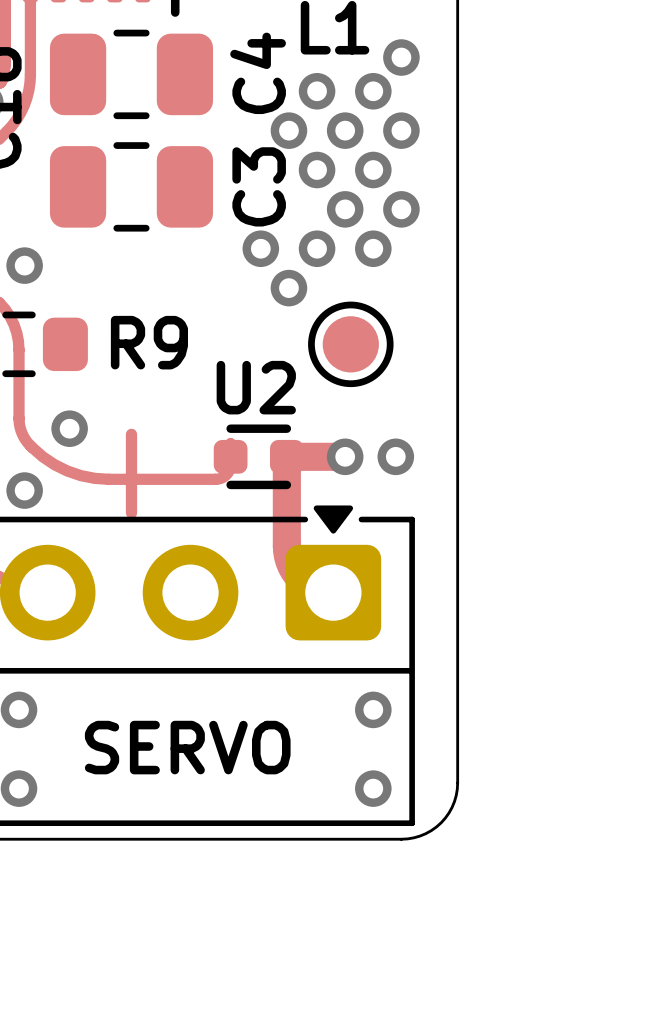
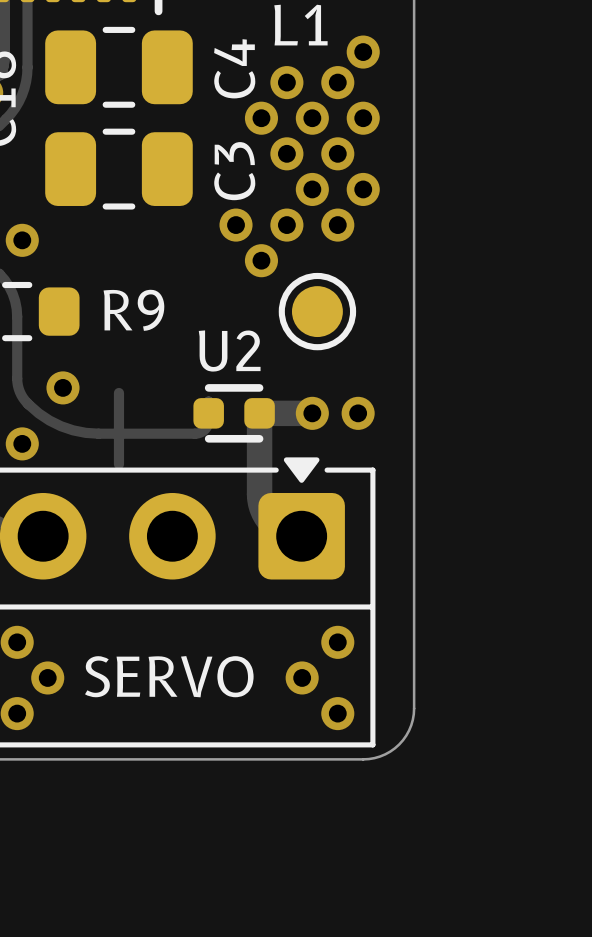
via: none -> (47, 677)
via: none -> (302, 677)

